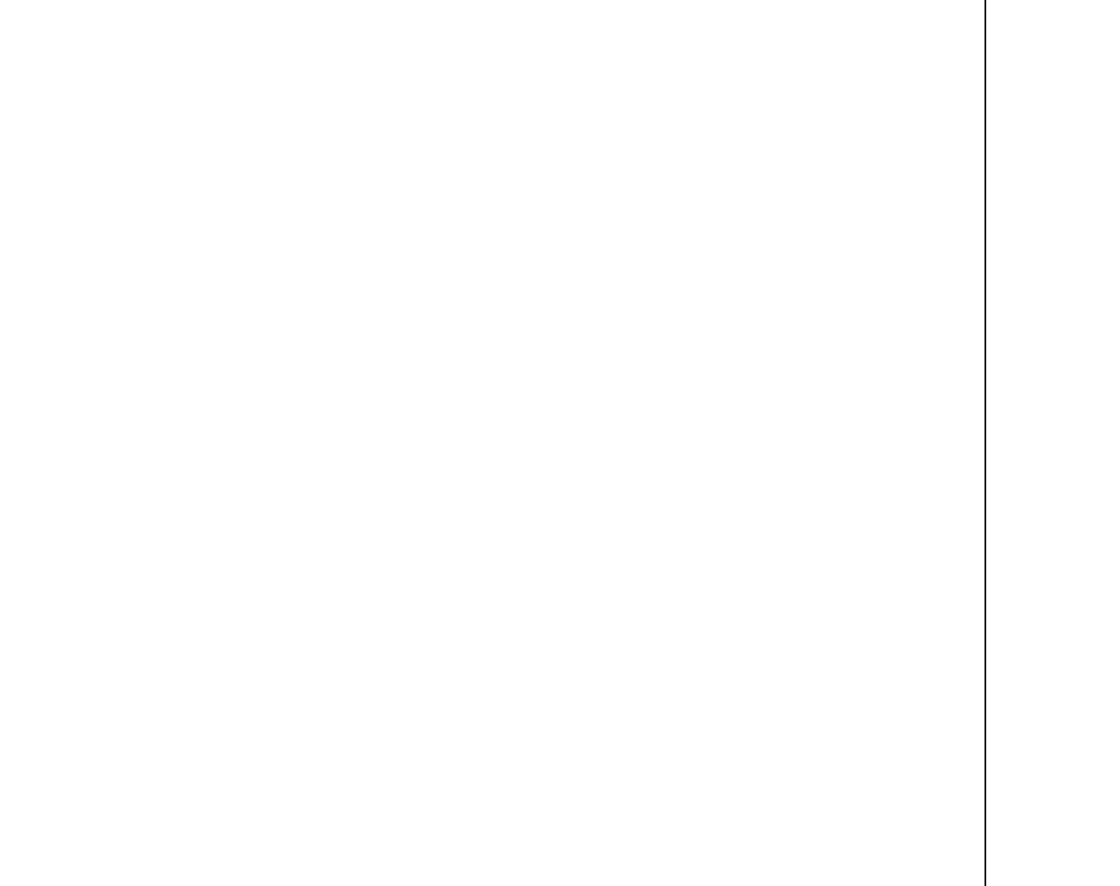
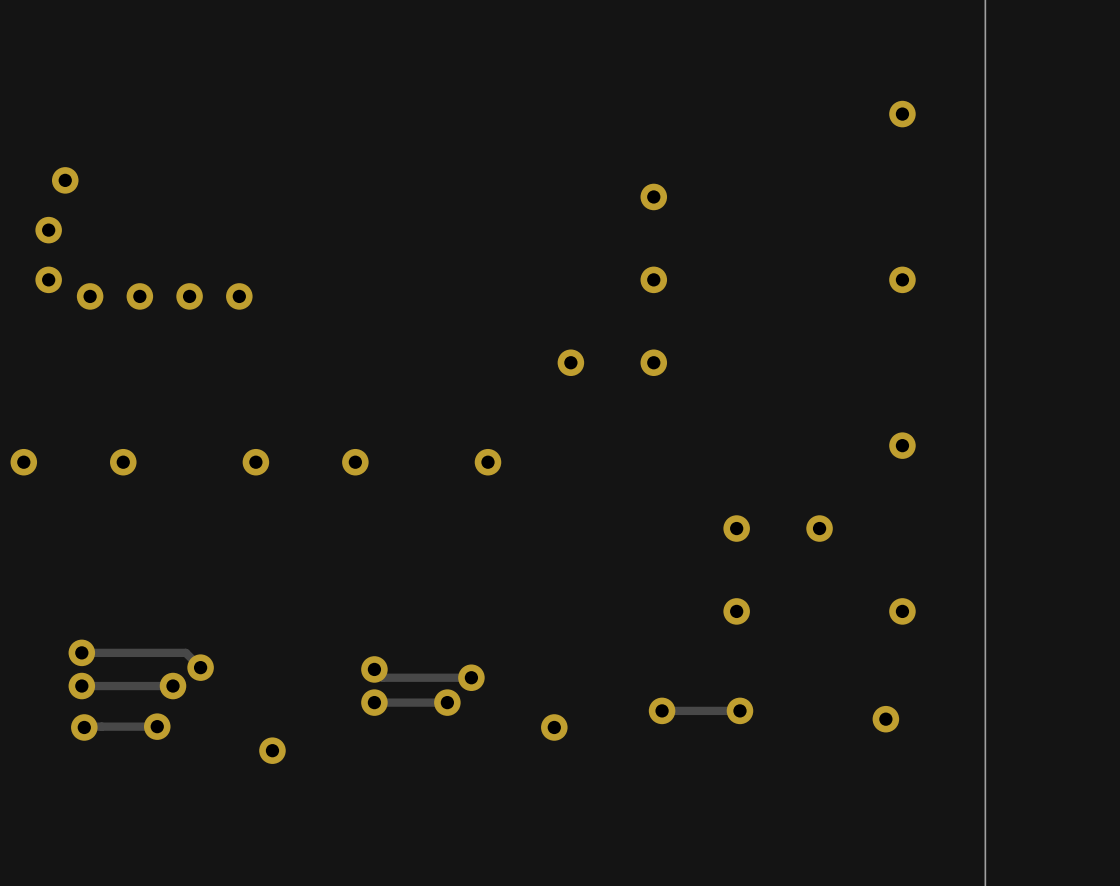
via: none -> (902, 114)
via: none -> (65, 180)
via: none -> (653, 196)
via: none -> (48, 230)
via: none -> (48, 279)
via: none -> (653, 279)
via: none -> (902, 279)
via: none -> (90, 296)
via: none -> (139, 296)
via: none -> (189, 296)
via: none -> (239, 296)
via: none -> (570, 362)
via: none -> (653, 362)
via: none -> (902, 445)
via: none -> (23, 462)
via: none -> (123, 462)
via: none -> (255, 462)
via: none -> (355, 462)
via: none -> (487, 462)
via: none -> (736, 528)
via: none -> (819, 528)
via: none -> (736, 611)
via: none -> (902, 611)
track: none -> (81, 652) (185, 652) (200, 667)
via: none -> (81, 652)
via: none -> (200, 667)
track: none -> (374, 669) (382, 677) (471, 677)
via: none -> (374, 669)
via: none -> (471, 677)
via: none -> (81, 686)
track: none -> (173, 686) (81, 686)
via: none -> (173, 686)
via: none -> (374, 702)
track: none -> (447, 702) (374, 702)
via: none -> (447, 702)
via: none -> (662, 710)
track: none -> (739, 710) (662, 710)
via: none -> (739, 710)
via: none -> (885, 719)
track: none -> (157, 726) (84, 727)
via: none -> (157, 726)
via: none -> (84, 727)
via: none -> (554, 727)
via: none -> (272, 750)

